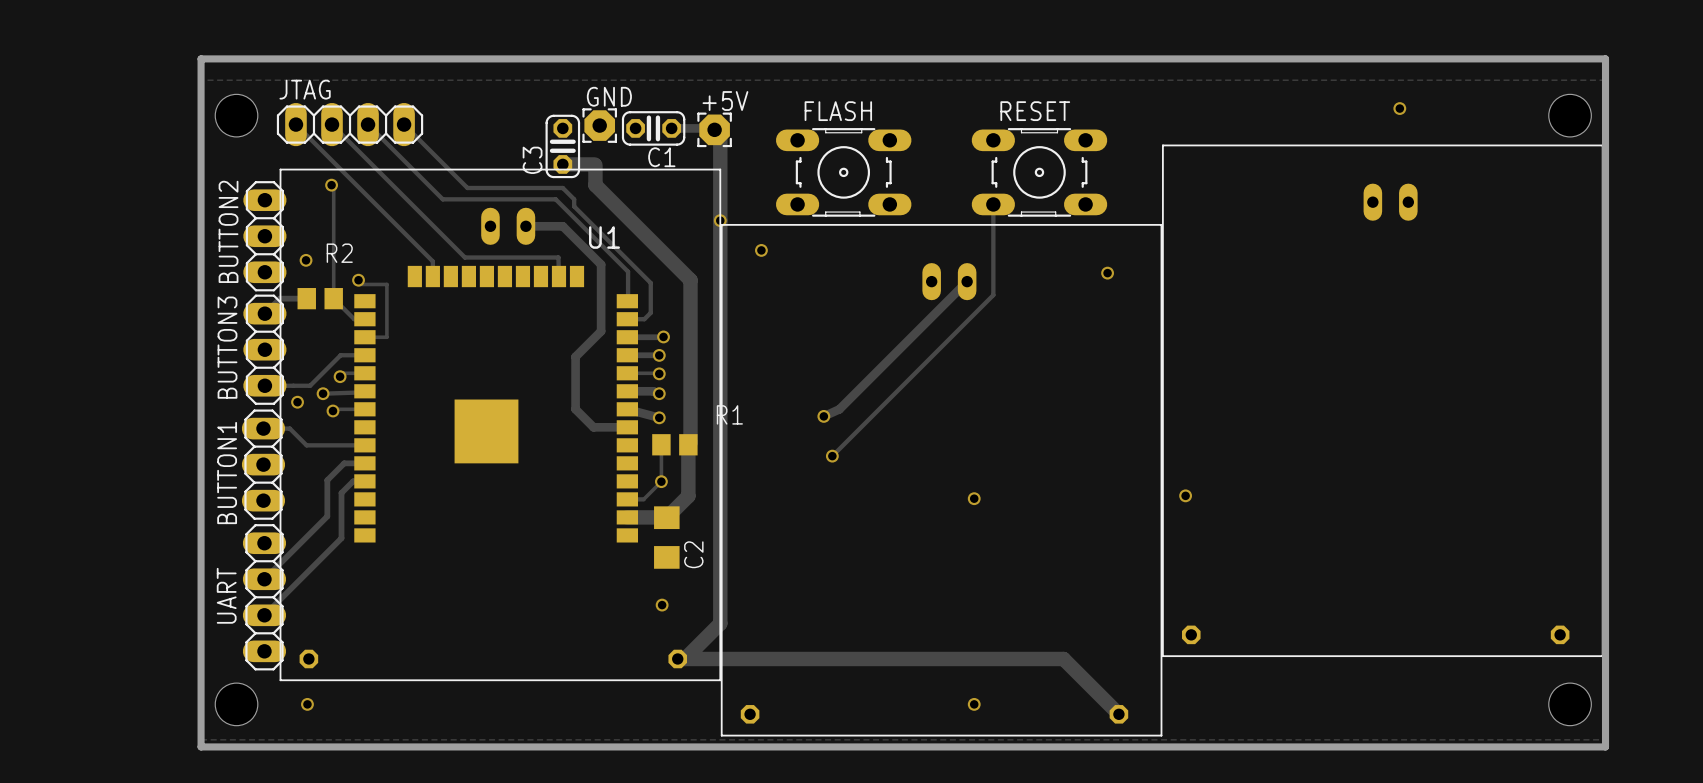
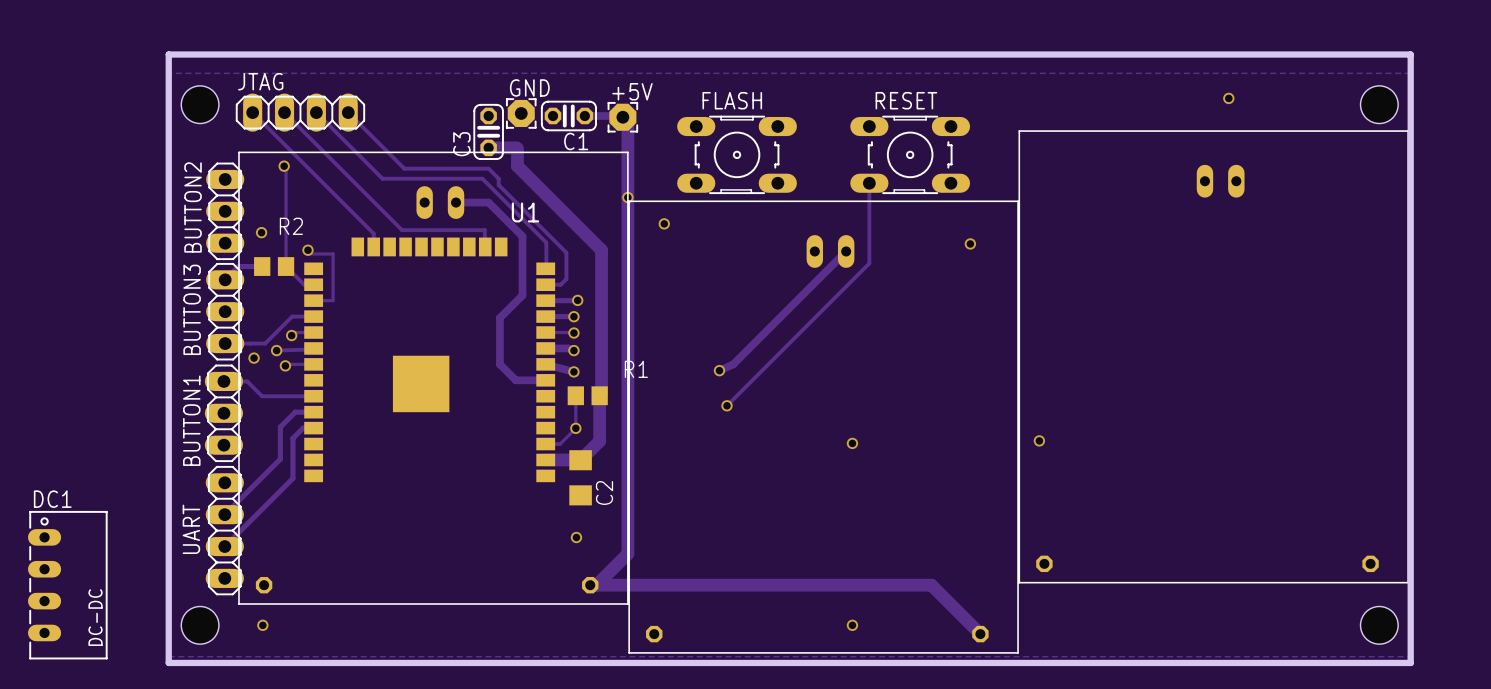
DC1: none -> (67, 585)

